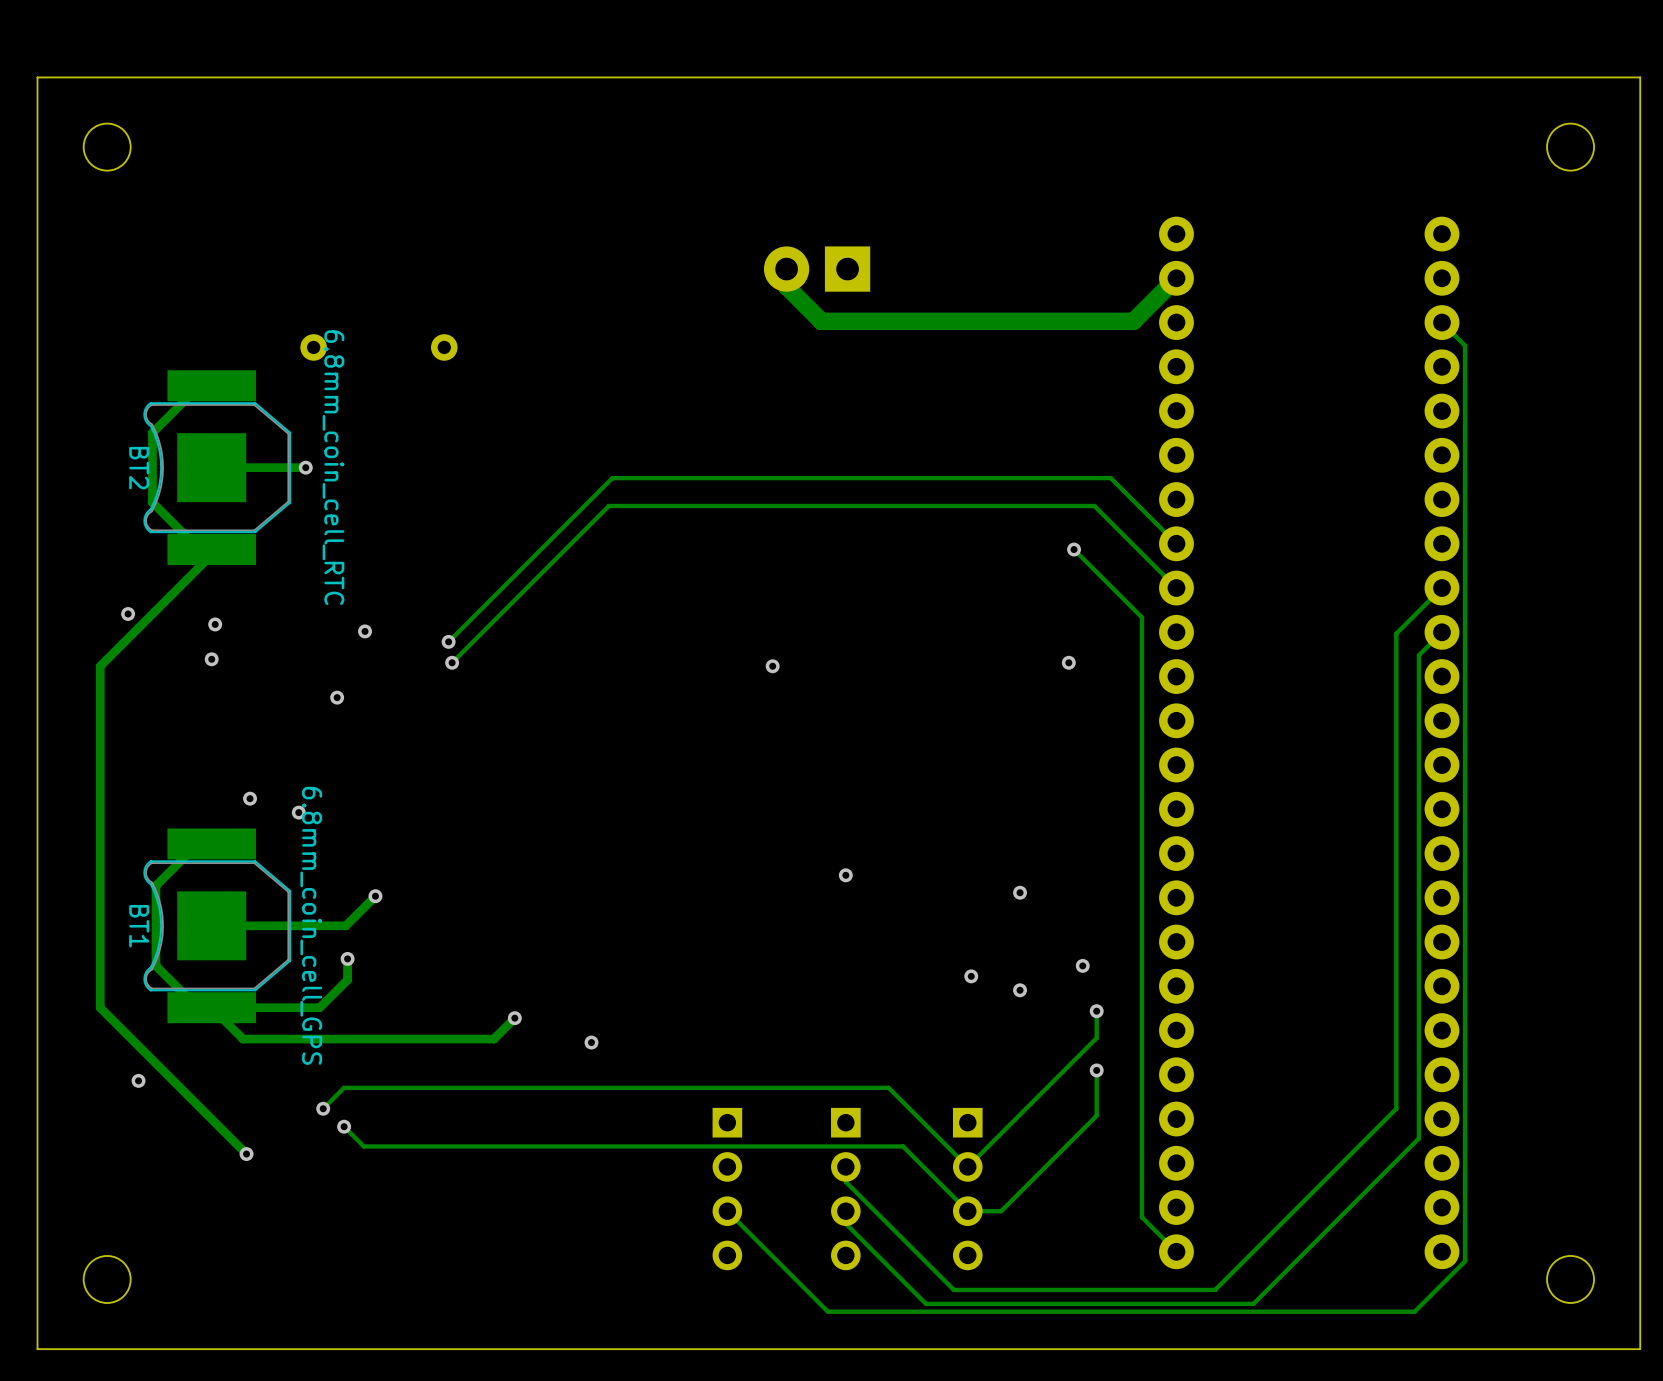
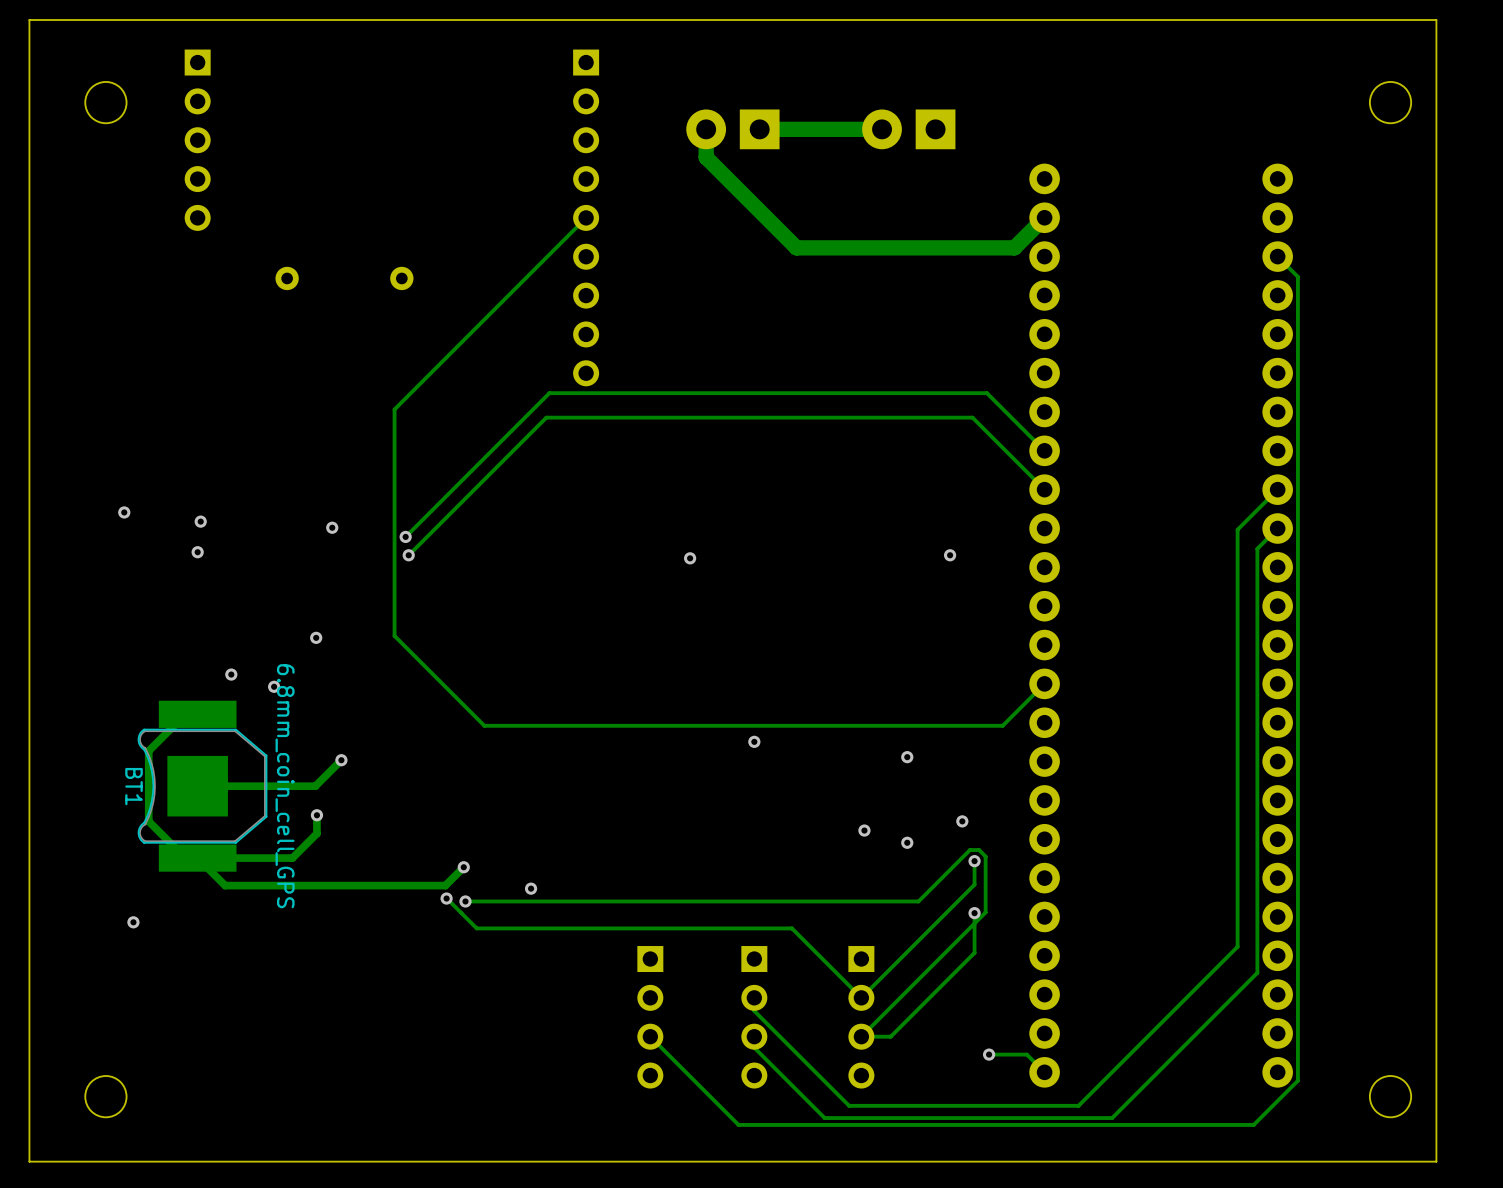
board edge: (1640, 77) (37, 77) (37, 1349) (1640, 1349) (1640, 77) -> (1436, 20) (1436, 1161) (29, 1161) (29, 20) (1436, 20)
track: none -> (882, 129) (759, 129)
part: none -> (908, 129)
part: none -> (197, 140)
track: (786, 269) (786, 286) (821, 321) (1133, 321) (1142, 312) -> (706, 129) (706, 157) (796, 247) (1014, 247)
part position: (817, 269) -> (732, 129)
track: none -> (586, 217) (394, 409) (394, 635) (484, 725) (1002, 725) (1044, 683)
part: none -> (586, 217)
track: (241, 385) (199, 385) (152, 432) (152, 502) (199, 549) (241, 549) -> none
BT2: 6.8mm_coin_cell_RTC (217, 467) -> none
track: (305, 467) (225, 467) -> none
via: (305, 467) -> none
track: (211, 549) (211, 554) (100, 666) (100, 1007) (246, 1154) -> none
track: (1074, 549) (1141, 617) (1141, 1217) (1156, 1231) -> (989, 1054) (1026, 1054)
via: (1074, 549) -> none
via position: (337, 697) -> (316, 637)
via: none -> (446, 898)
via: none -> (465, 901)
track: (529, 1087) (344, 1087) (323, 1108) -> (476, 928) (446, 898)
via: (323, 1108) -> none
track: (344, 1126) (363, 1146) (903, 1146) (967, 1211) -> (465, 901) (918, 901) (969, 850) (979, 850) (985, 856) (985, 912) (861, 1036)
via: (344, 1126) -> none
via: (246, 1154) -> none
via: none -> (989, 1054)

